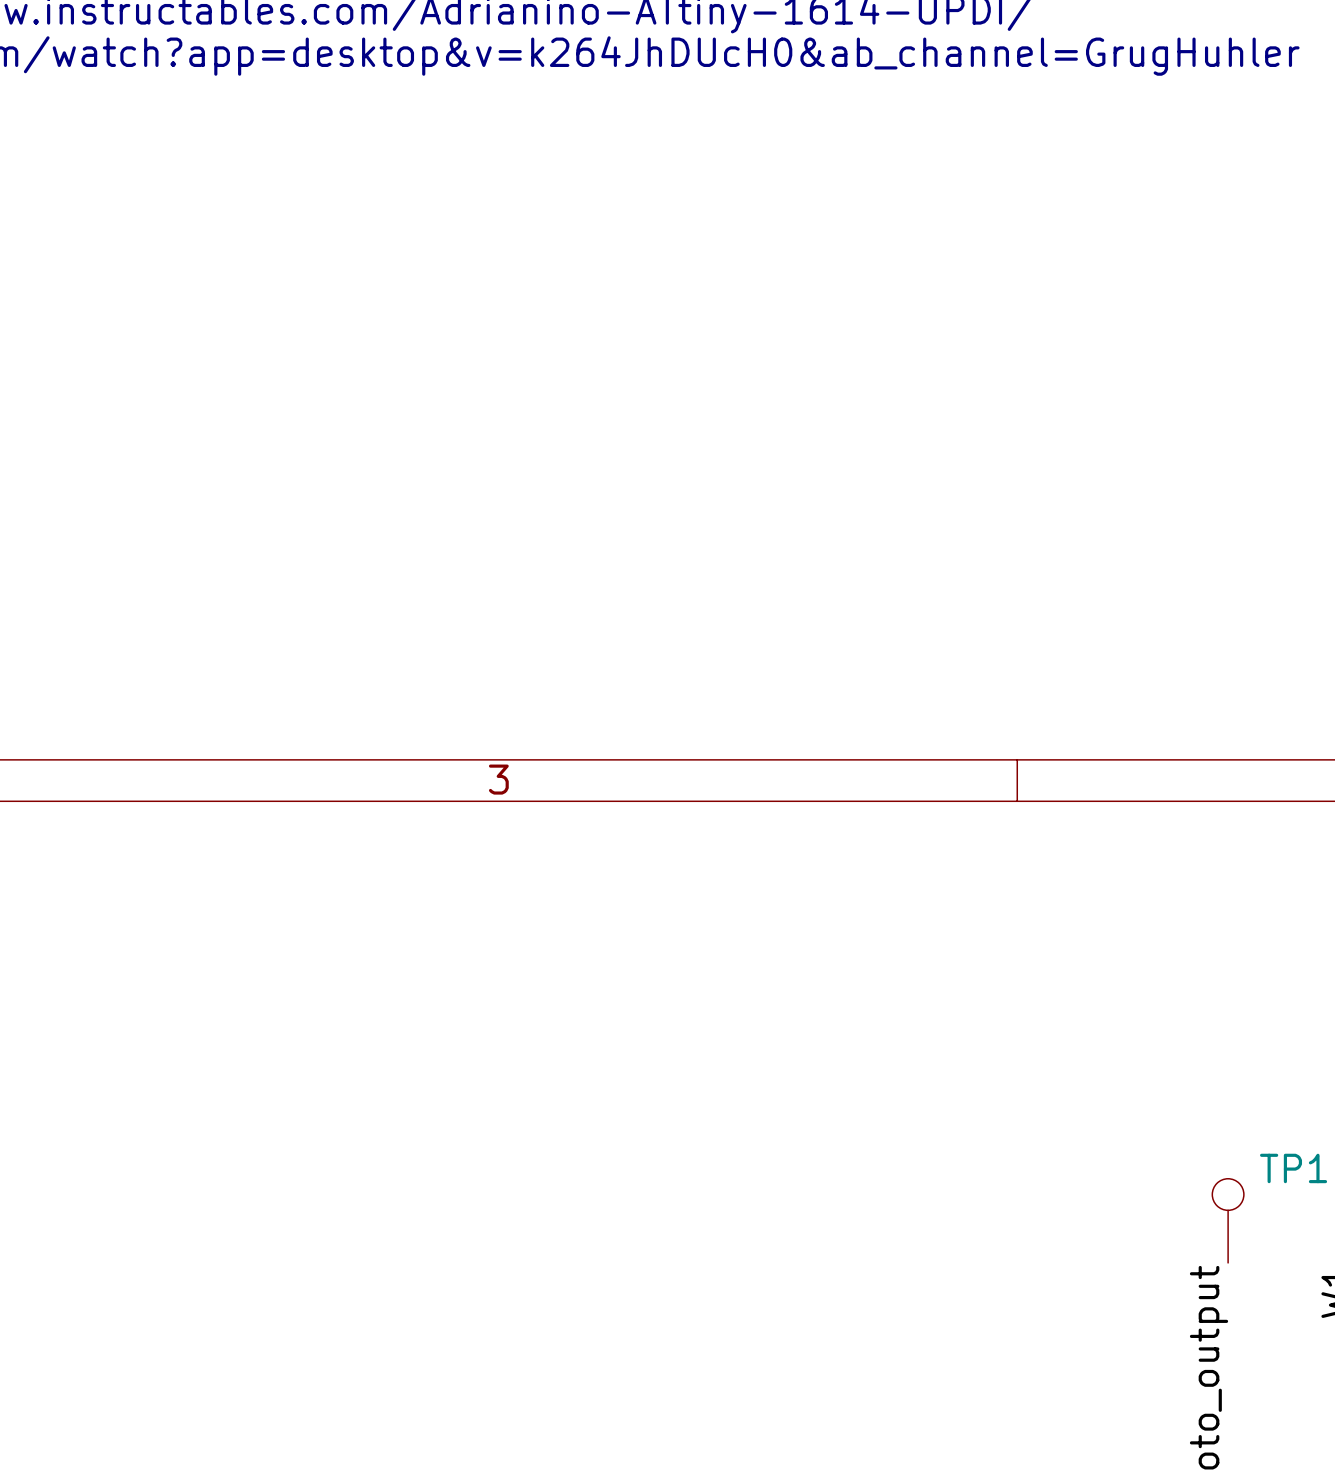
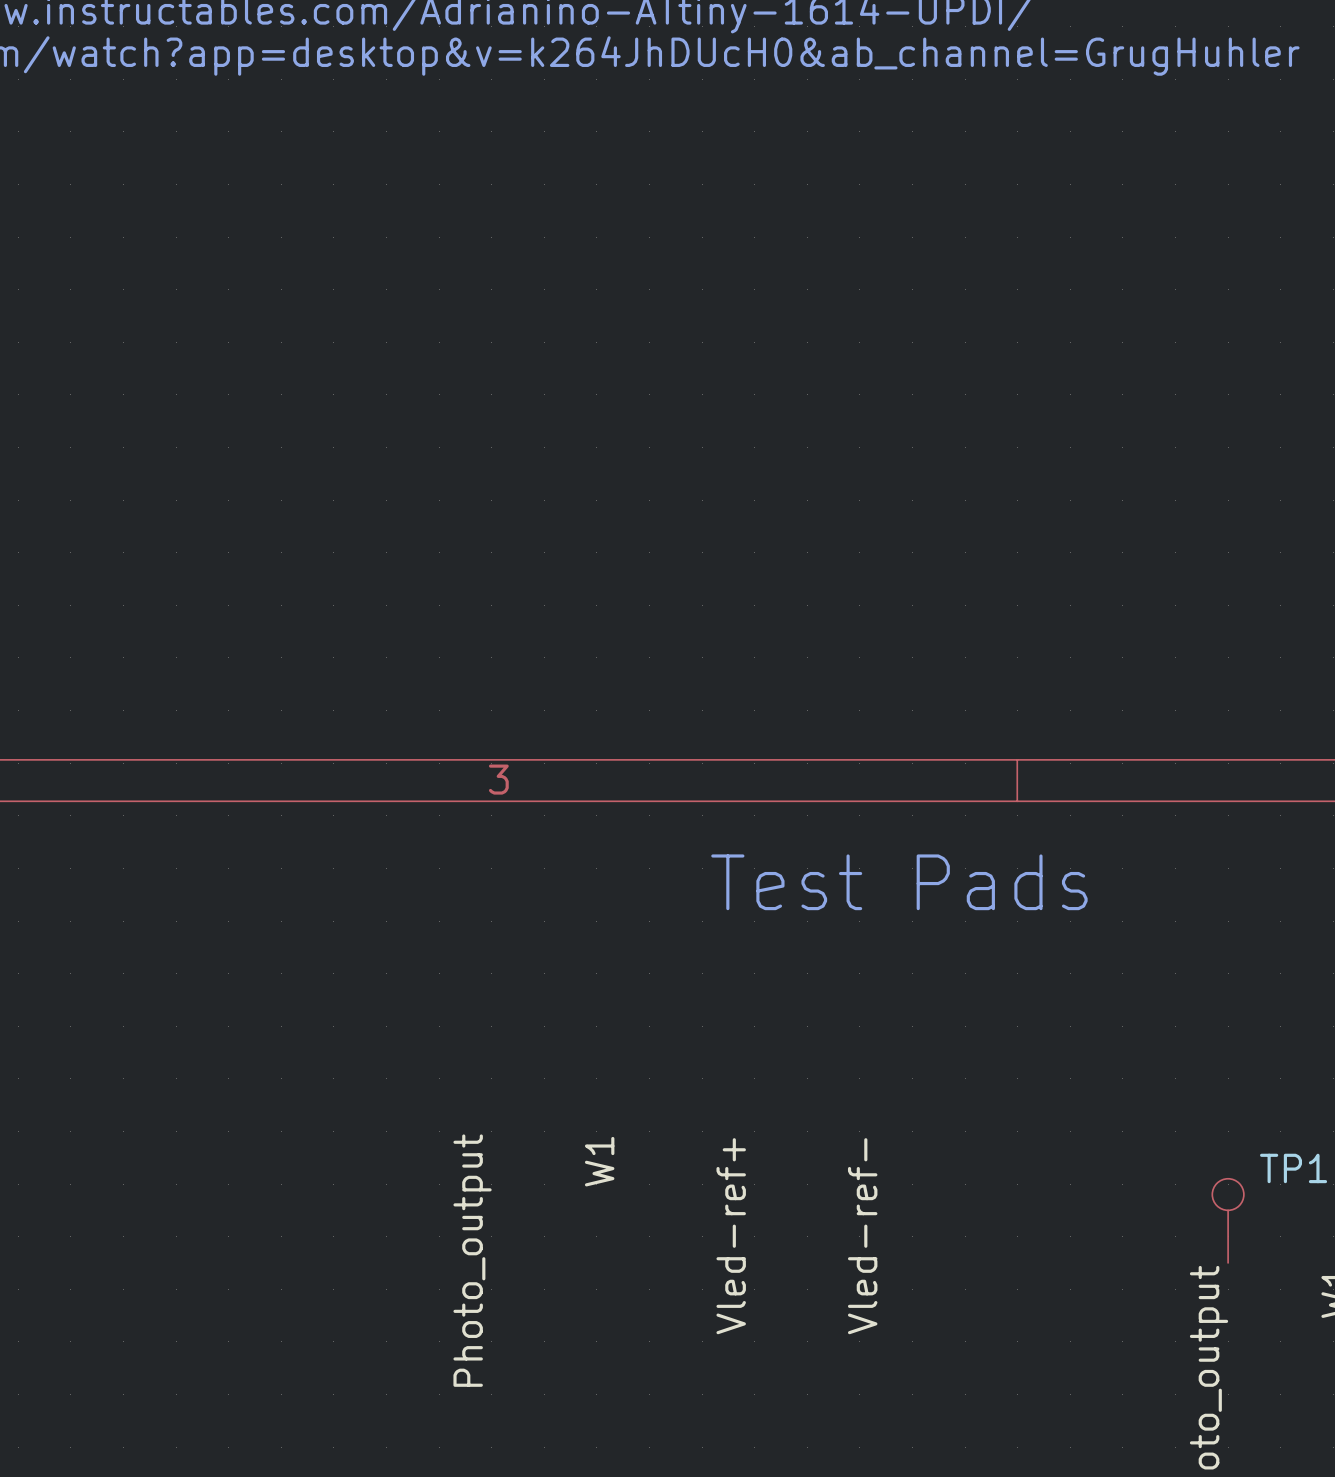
text: none -> Test Pads (899, 882)
label: none -> W1 (599, 1161)
label: none -> Vled-ref+ (731, 1236)
label: none -> Vled-ref- (862, 1236)
label: none -> Photo_output (472, 1260)

